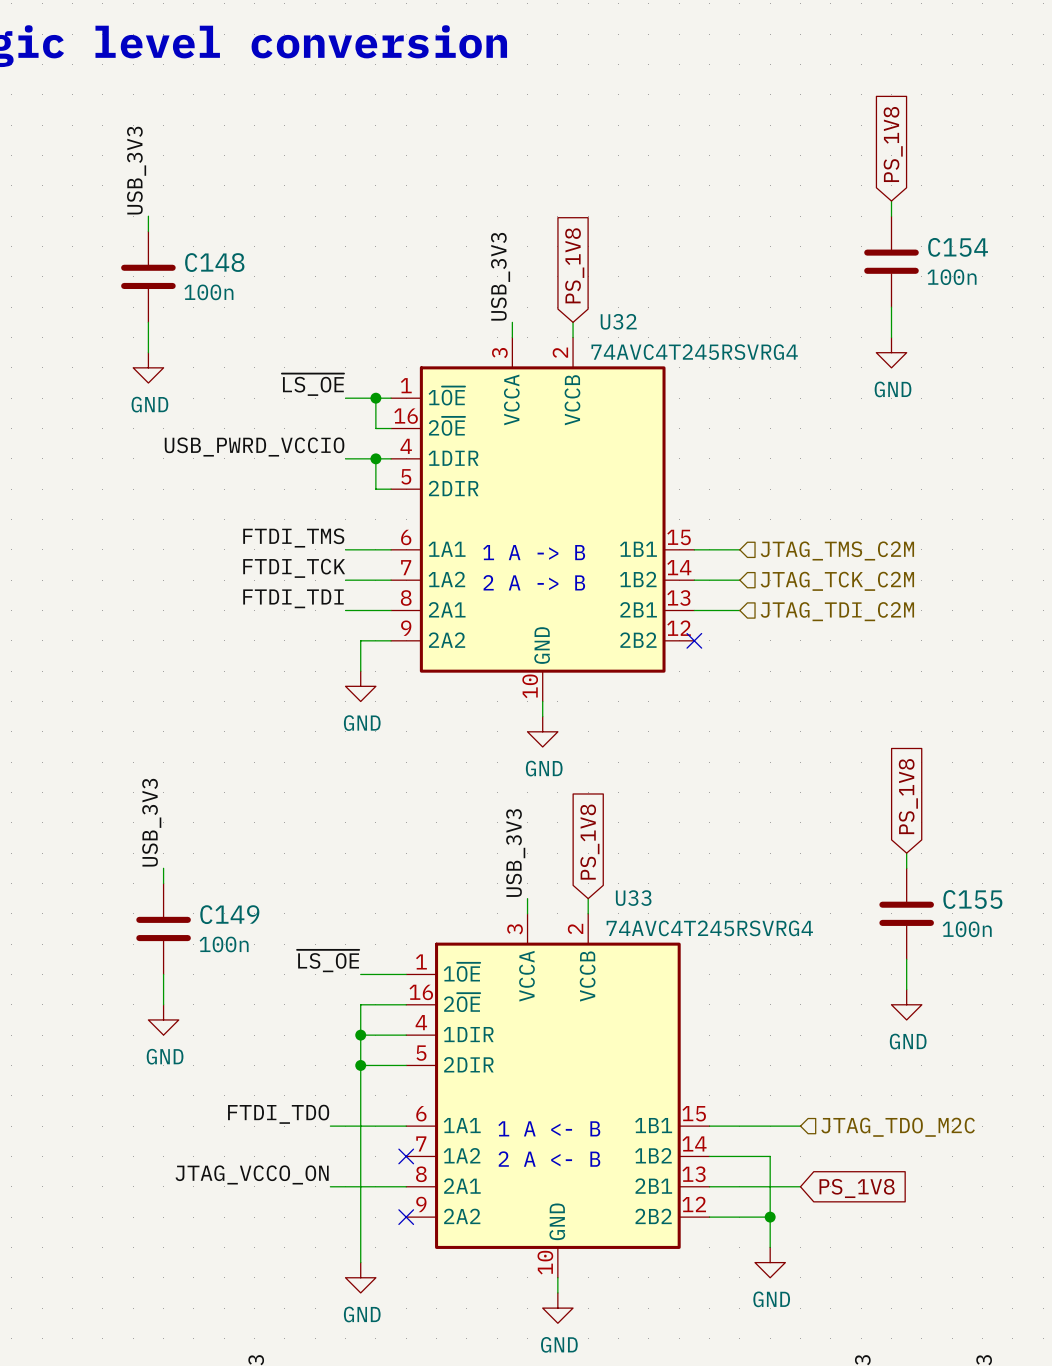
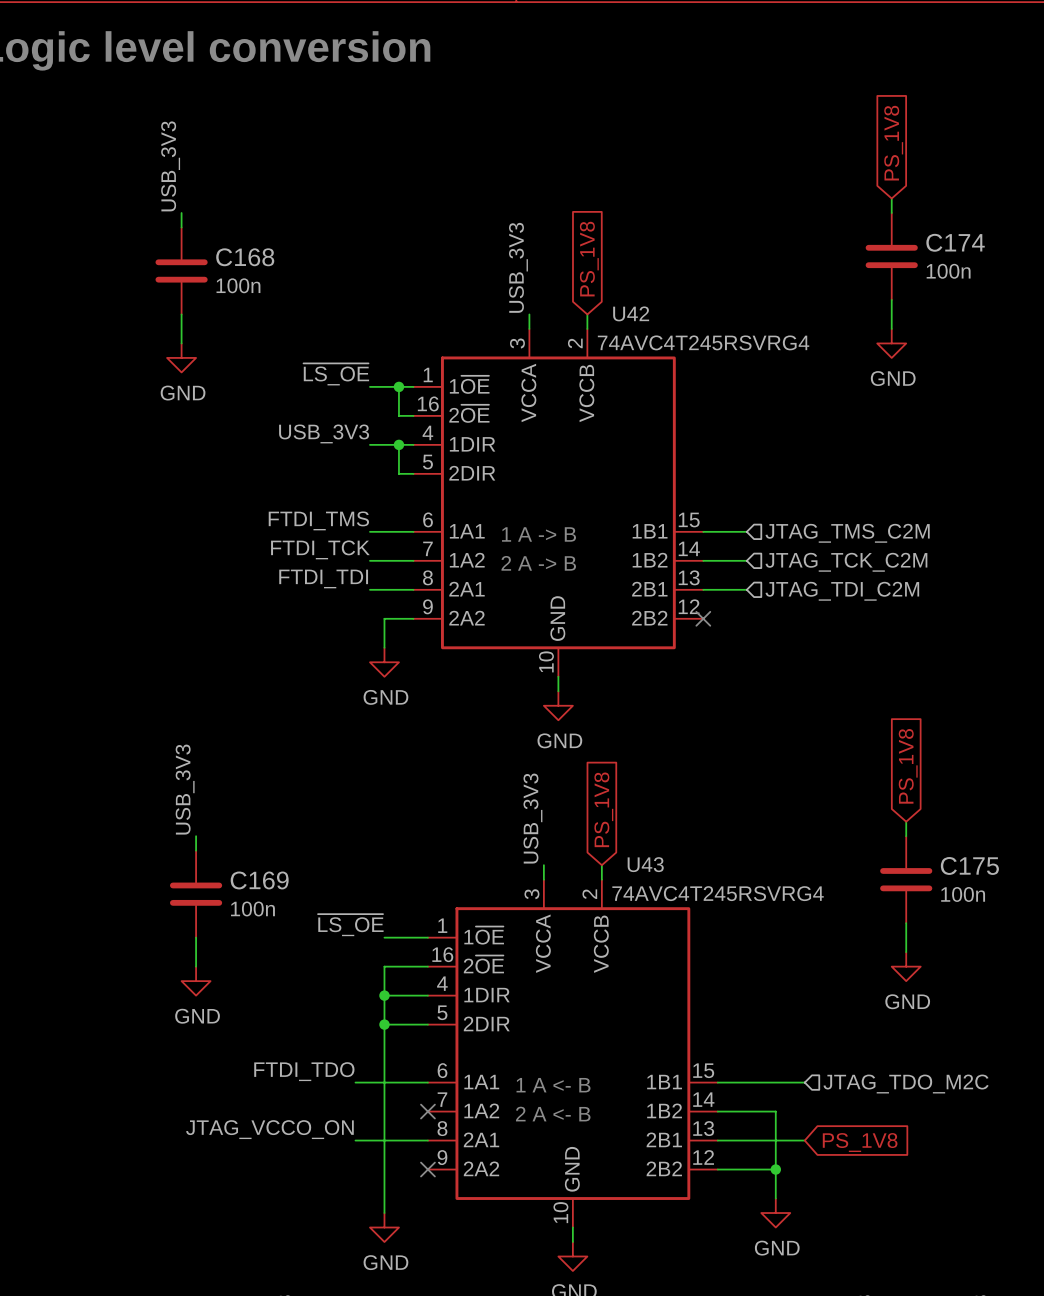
C154 name: C154 (958, 247) -> C174 (955, 242)
C148 name: C148 (214, 262) -> C168 (245, 257)
U32 name: U32 (618, 321) -> U42 (631, 313)
label: USB_PWRD_VCCIO (254, 447) -> USB_3V3 (324, 433)
U33 name: U33 (633, 898) -> U43 (645, 864)
C155 name: C155 (972, 899) -> C175 (969, 865)
C149 name: C149 (229, 914) -> C169 (259, 880)

